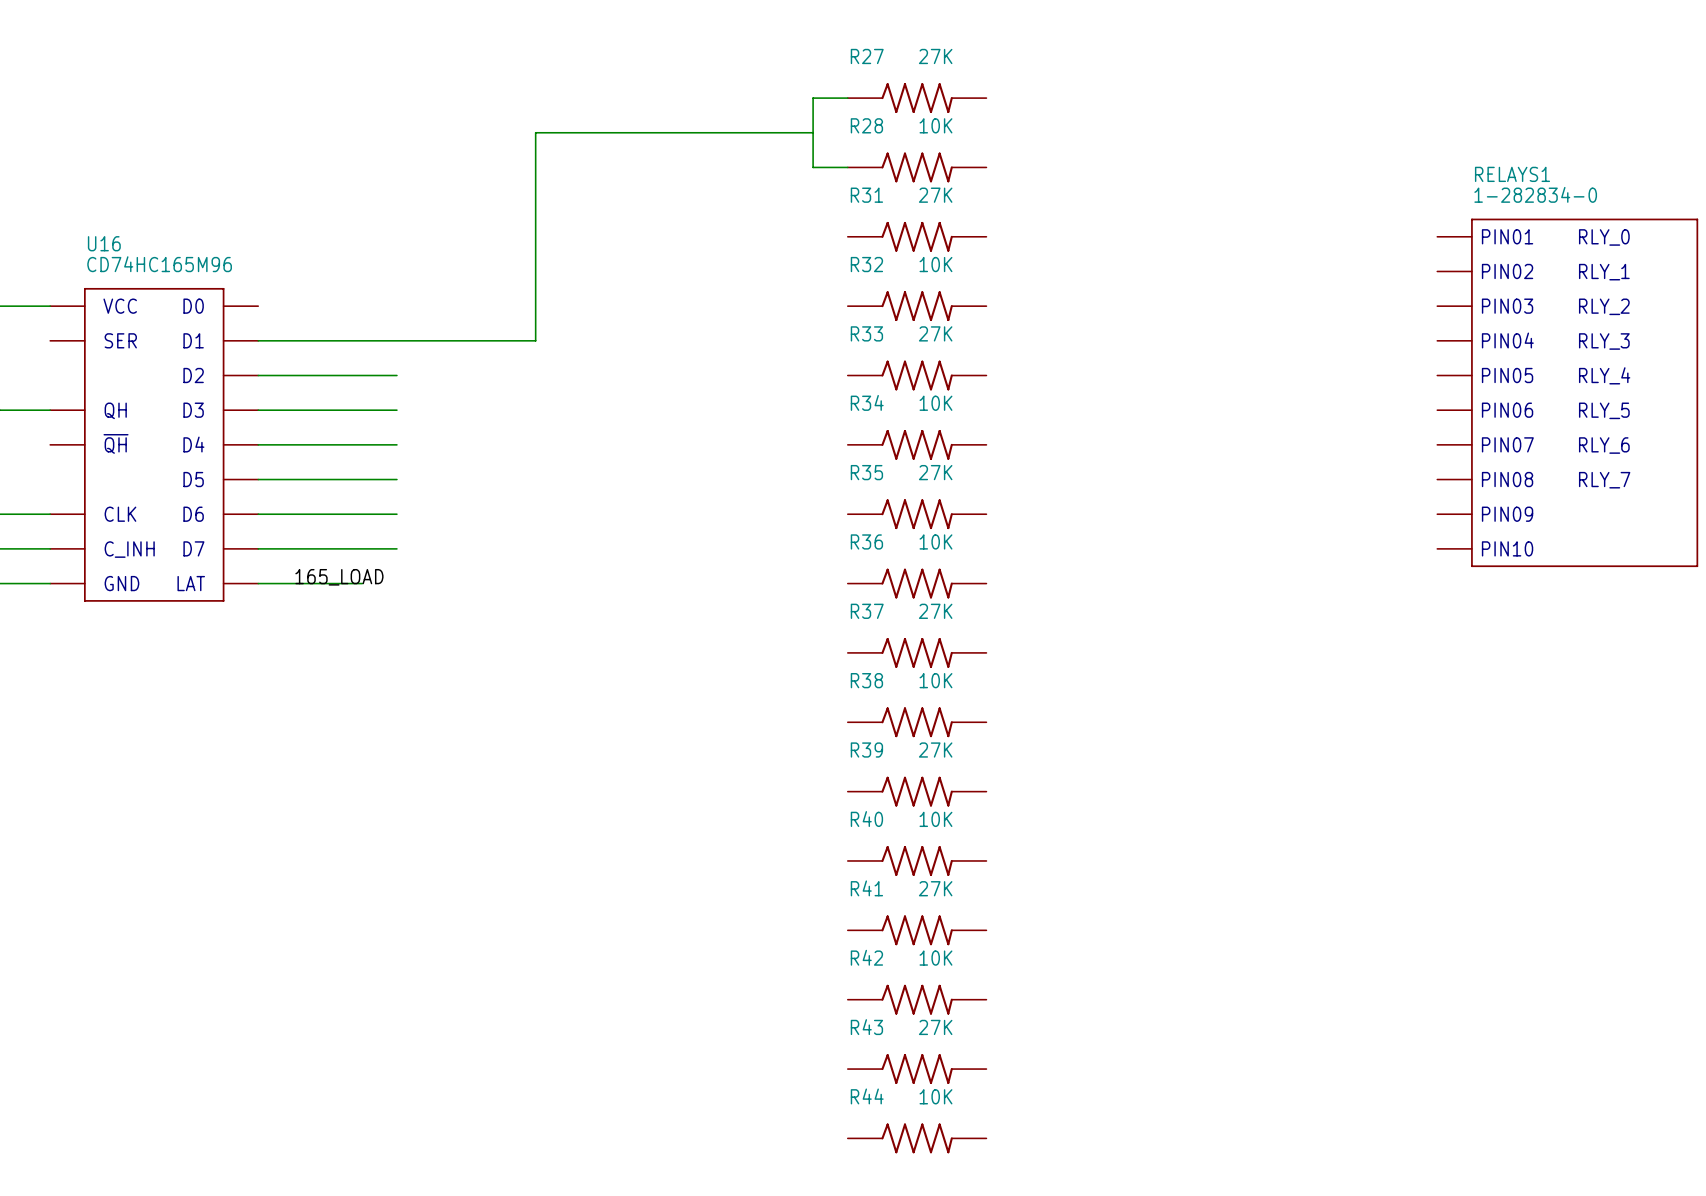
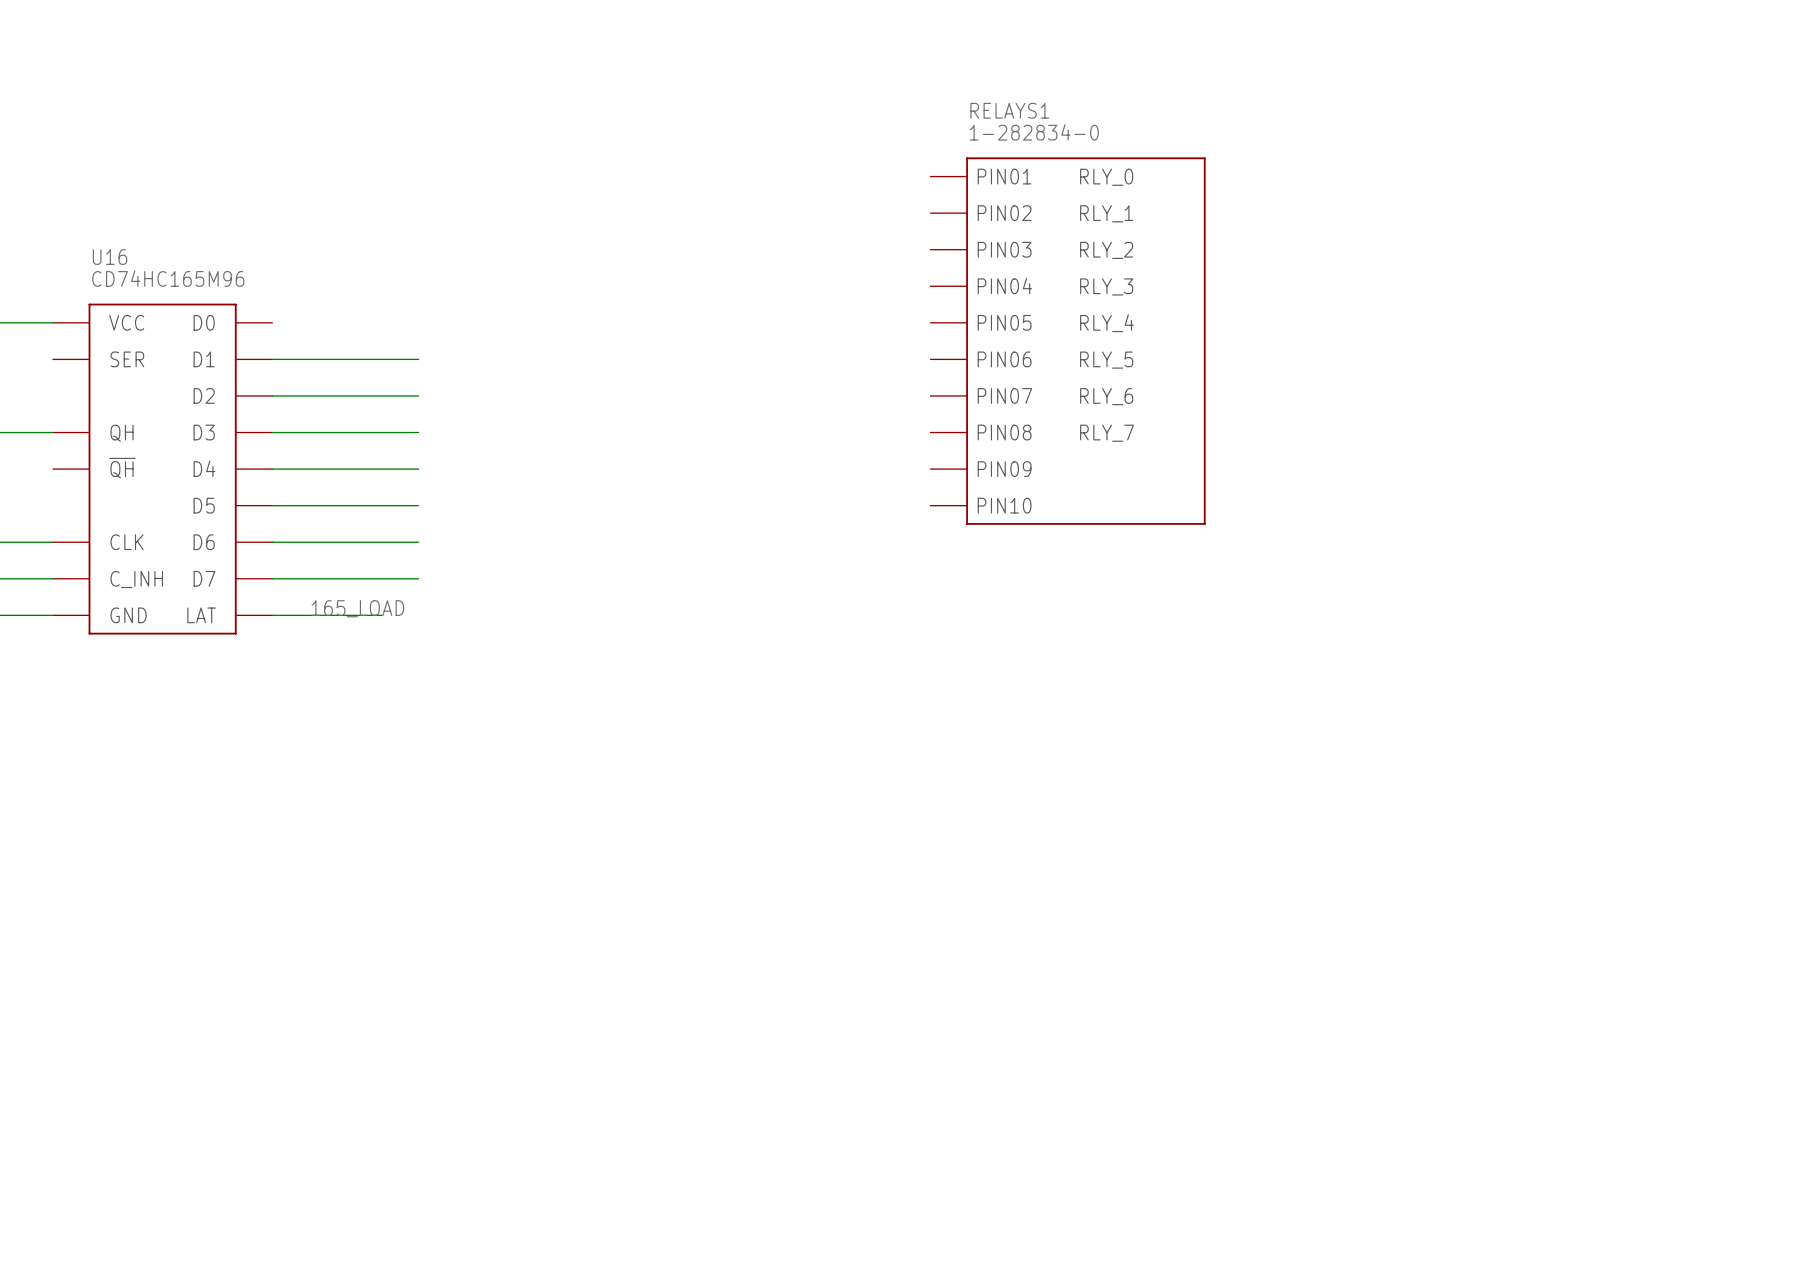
wire: (847, 98) (813, 98) (813, 167) (847, 167) -> none
R27: 27K (917, 98) -> none
wire: (813, 132) (535, 132) (535, 340) (396, 340) -> none
R28: 10K (917, 167) -> none
R31: 27K (917, 236) -> none
R32: 10K (917, 306) -> none
R33: 27K (917, 375) -> none
RELAYS1 position: (1567, 392) -> (1068, 341)
R34: 10K (917, 444) -> none
R35: 27K (917, 514) -> none
R36: 10K (917, 583) -> none
R37: 27K (917, 652) -> none
R38: 10K (917, 722) -> none
R39: 27K (917, 791) -> none
R40: 10K (917, 860) -> none
R41: 27K (917, 930) -> none
R42: 10K (917, 999) -> none
R43: 27K (917, 1069) -> none
R44: 10K (917, 1138) -> none

